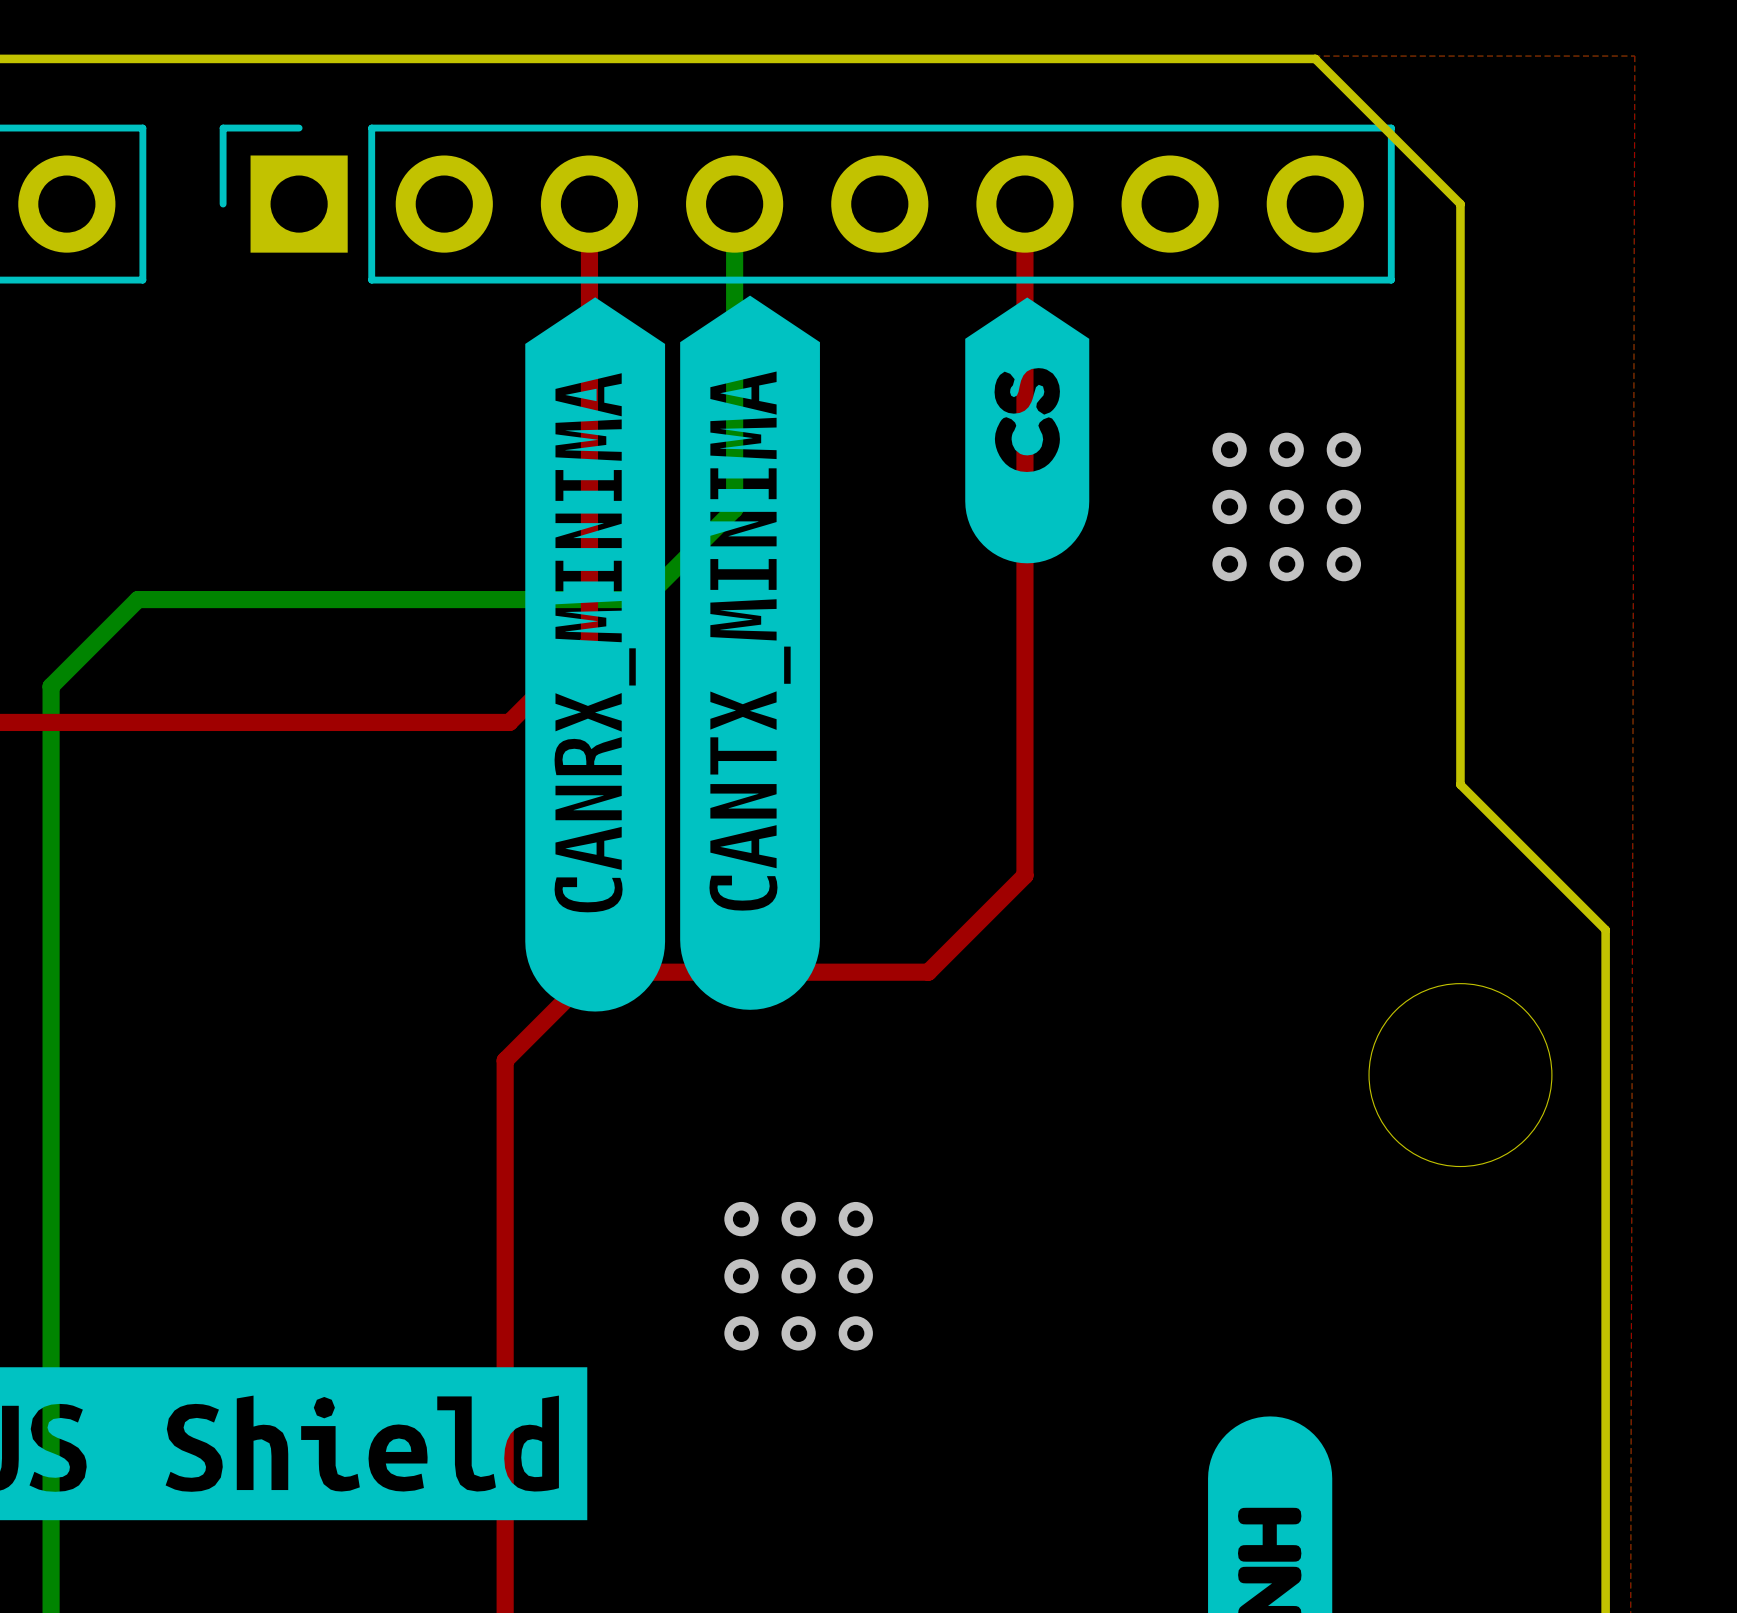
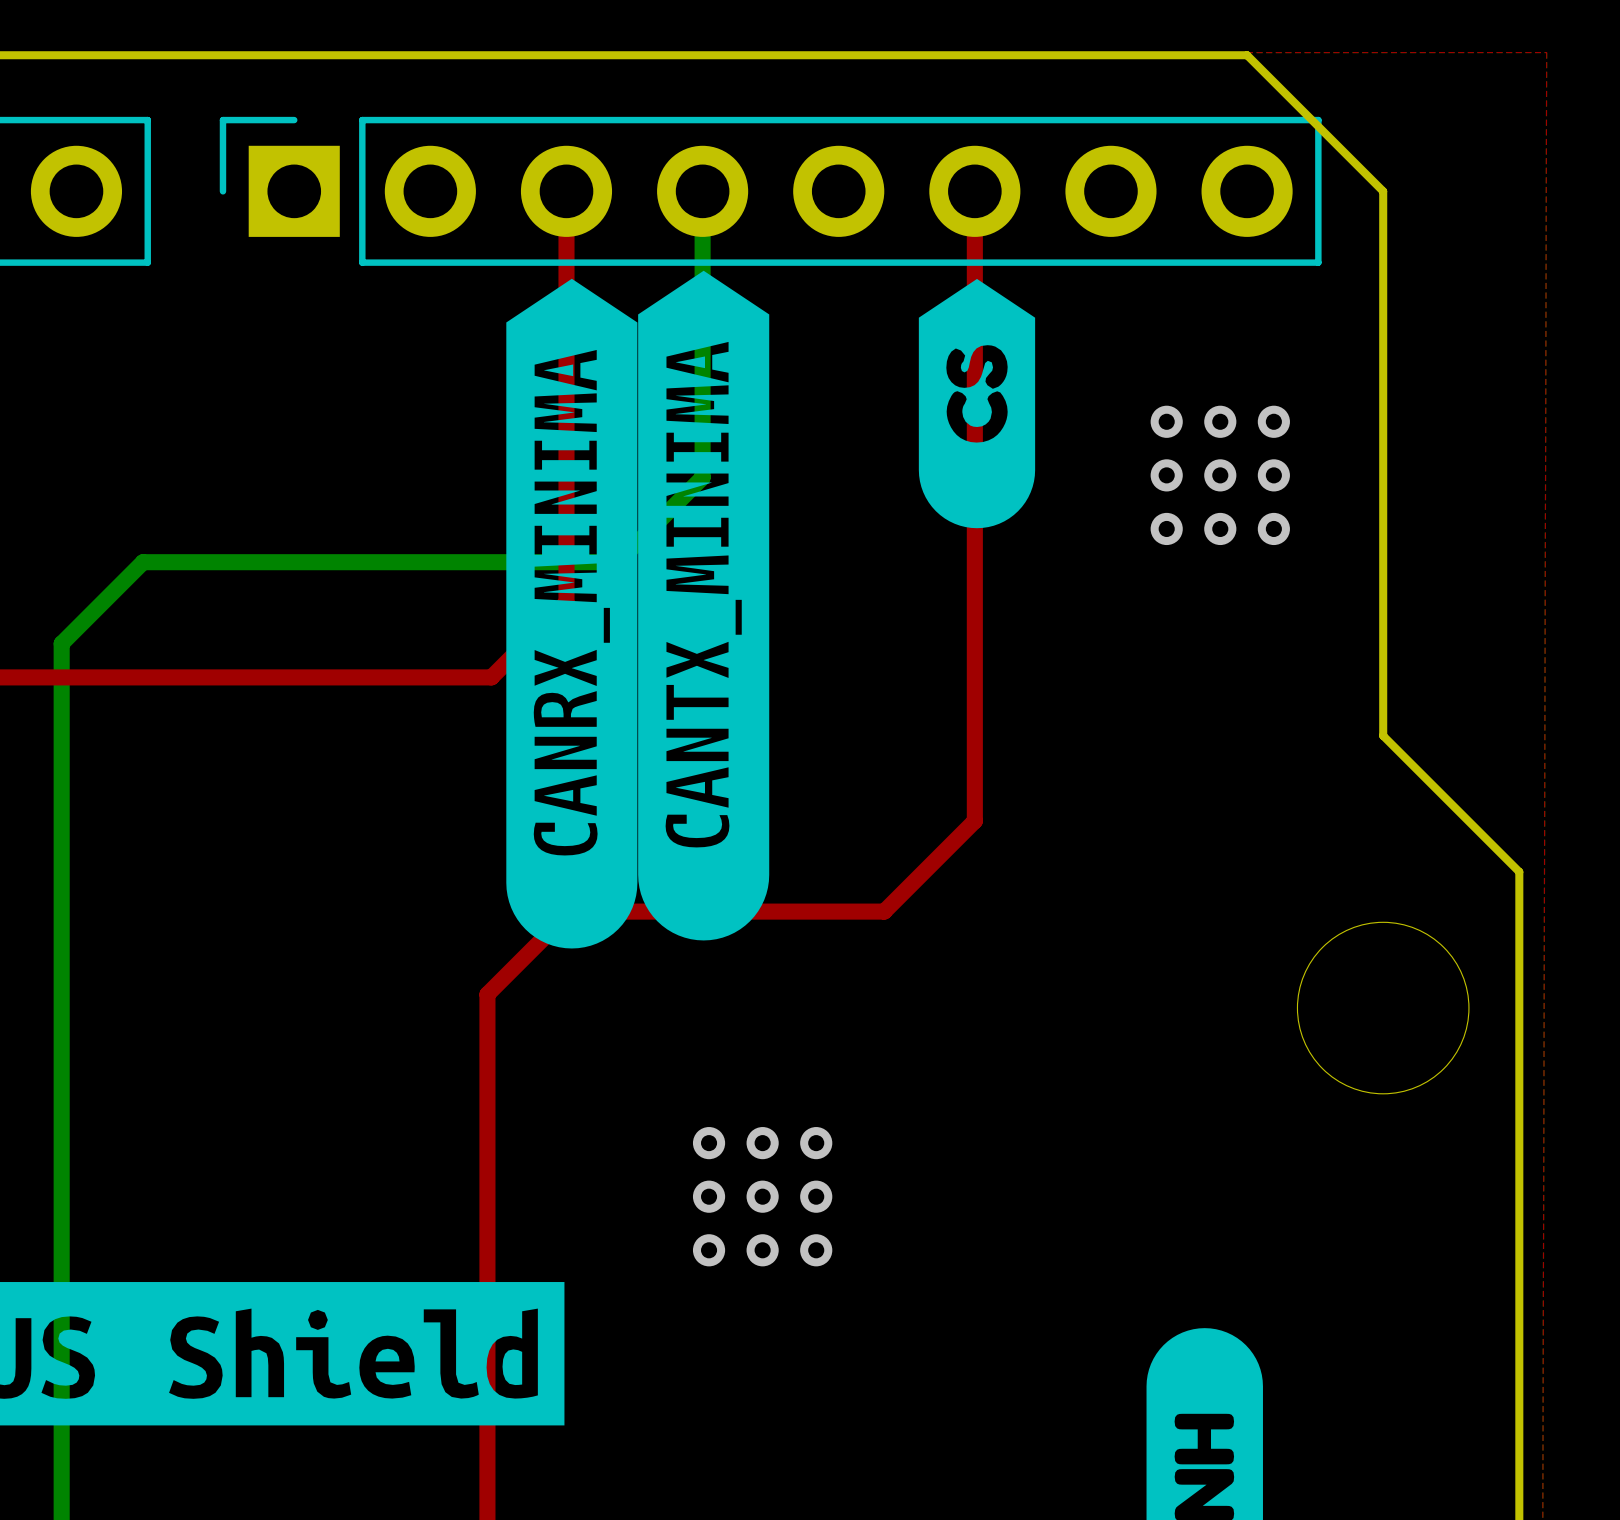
drawing position: (750, 652) -> (703, 605)

